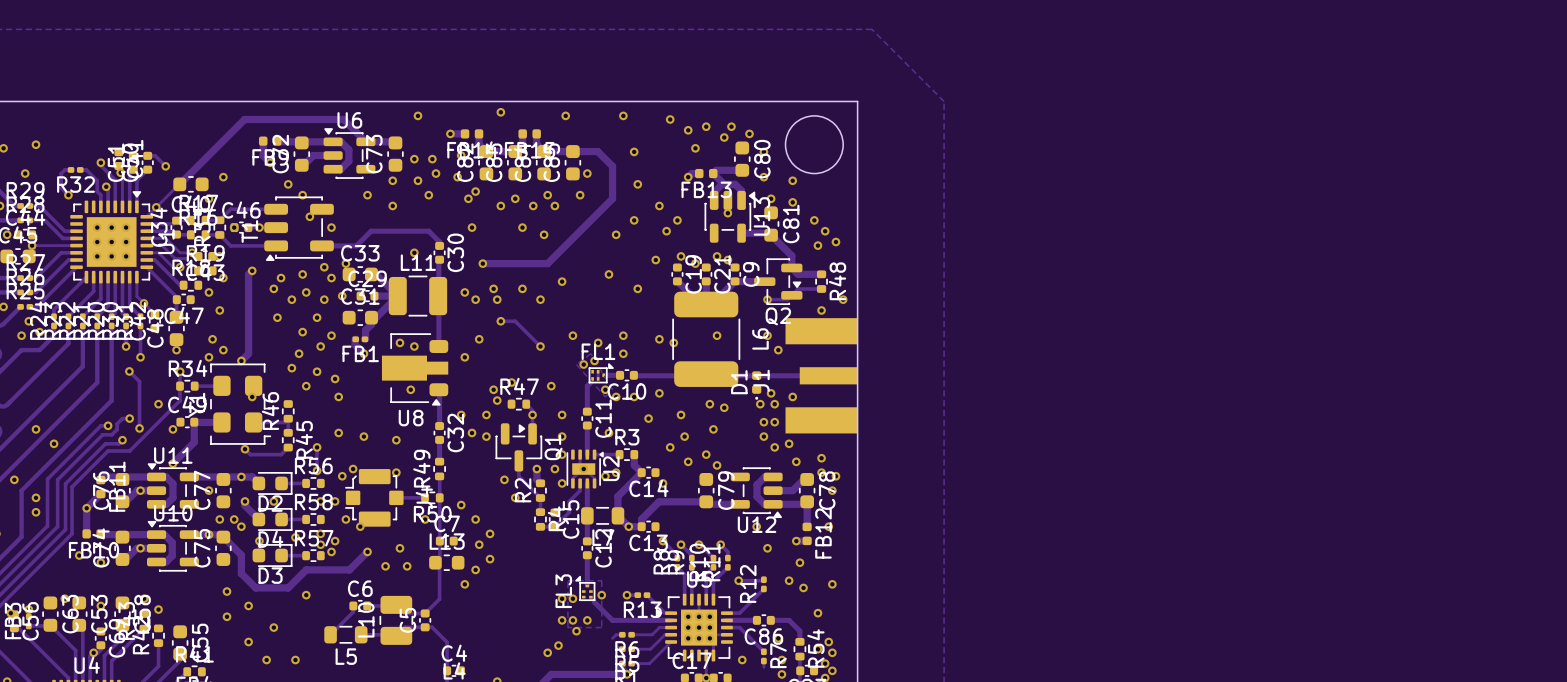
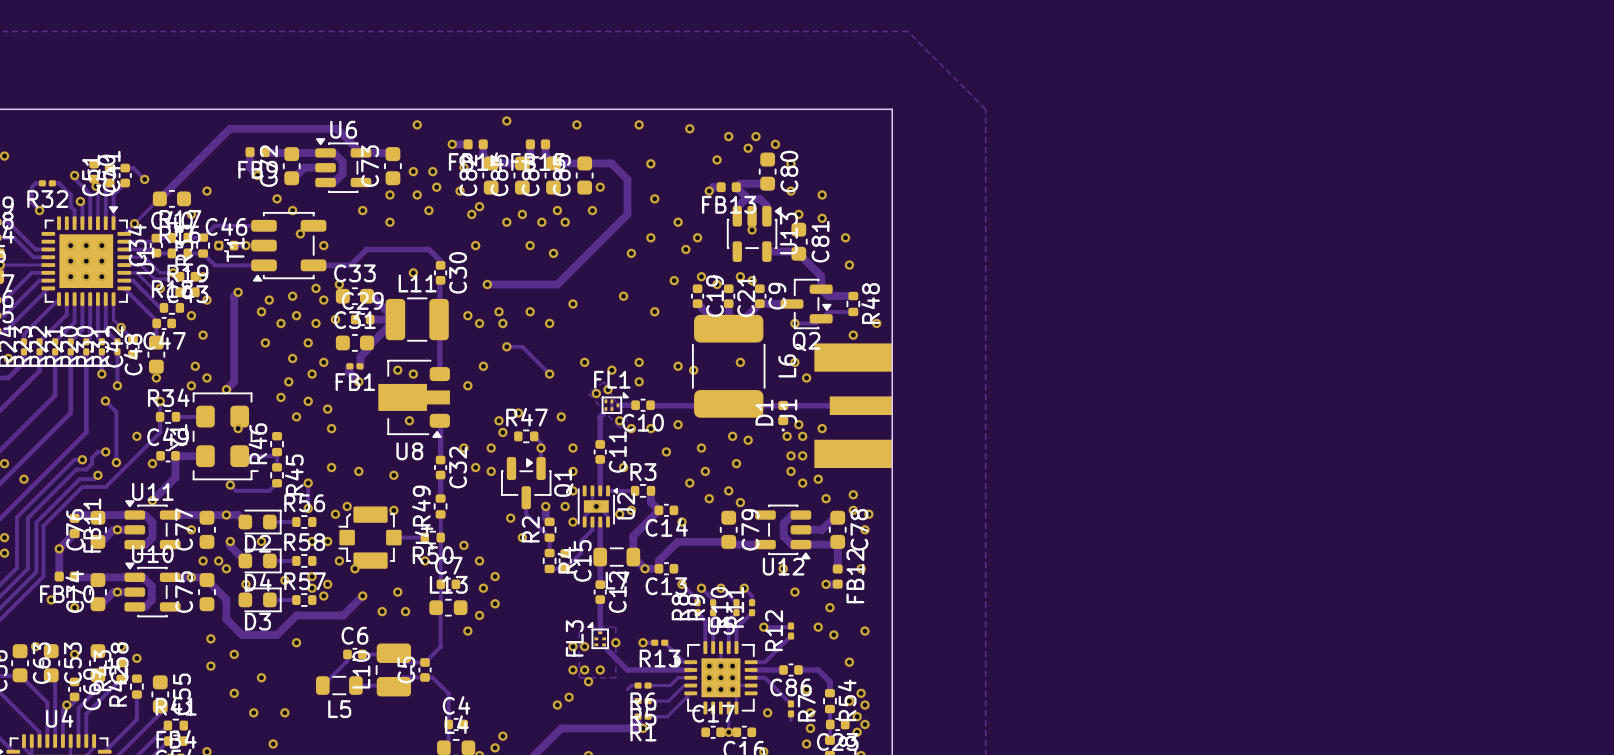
round board edge: [785, 115, 844, 174] -> none
via: (688, 130) -> none
via: (825, 231) -> none
via: (835, 242) -> none

